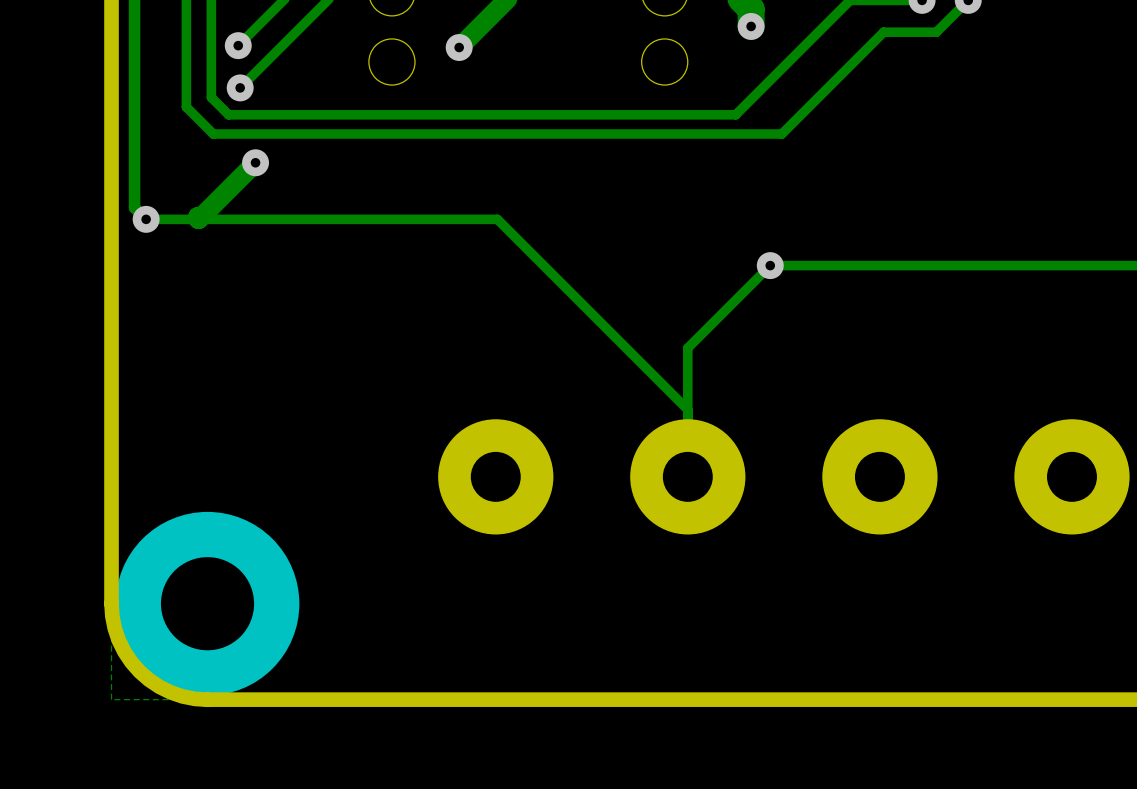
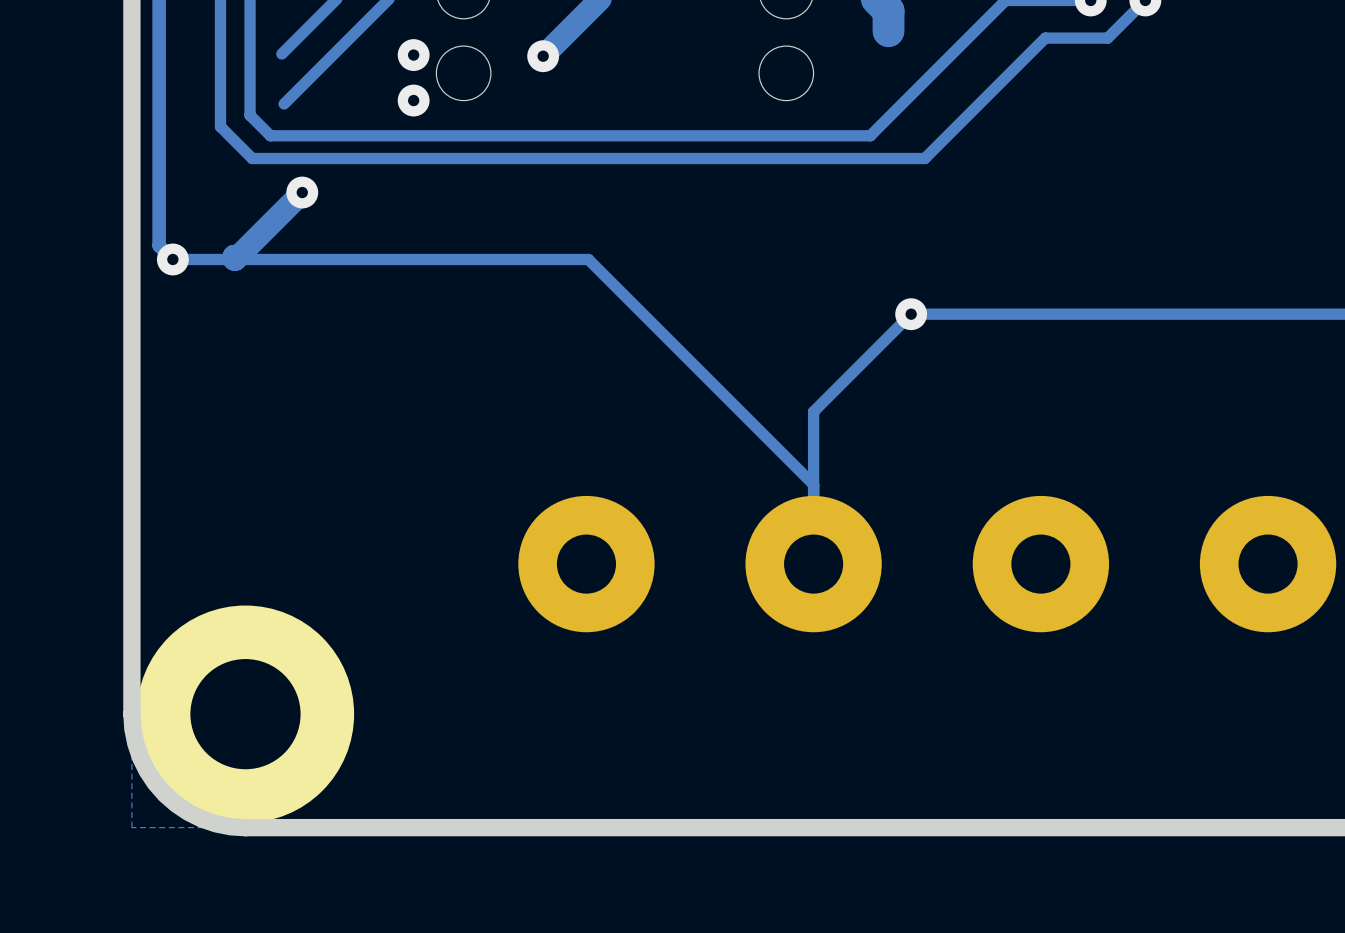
via: (751, 26) -> none
via: (238, 45) -> none
via: none -> (413, 55)
via: none -> (413, 100)
via: (240, 87) -> none

